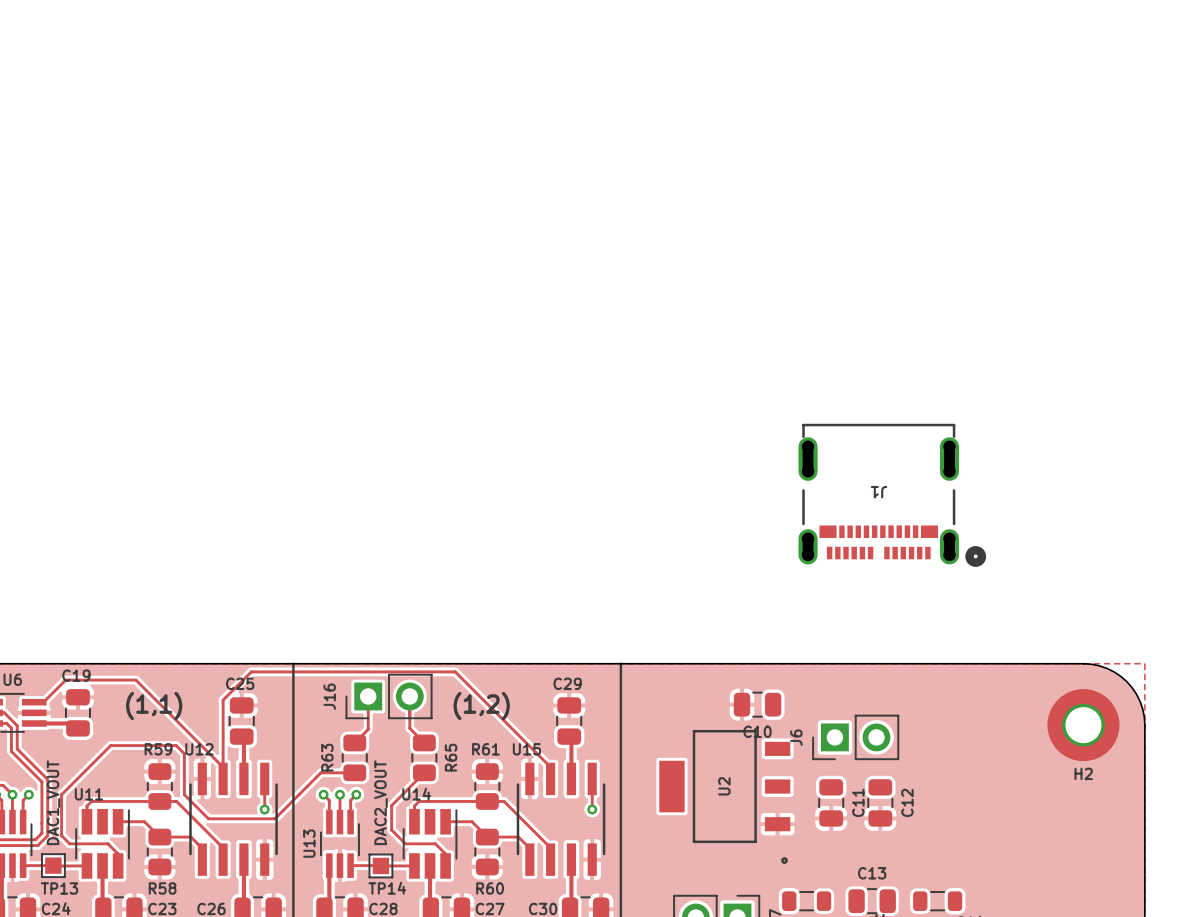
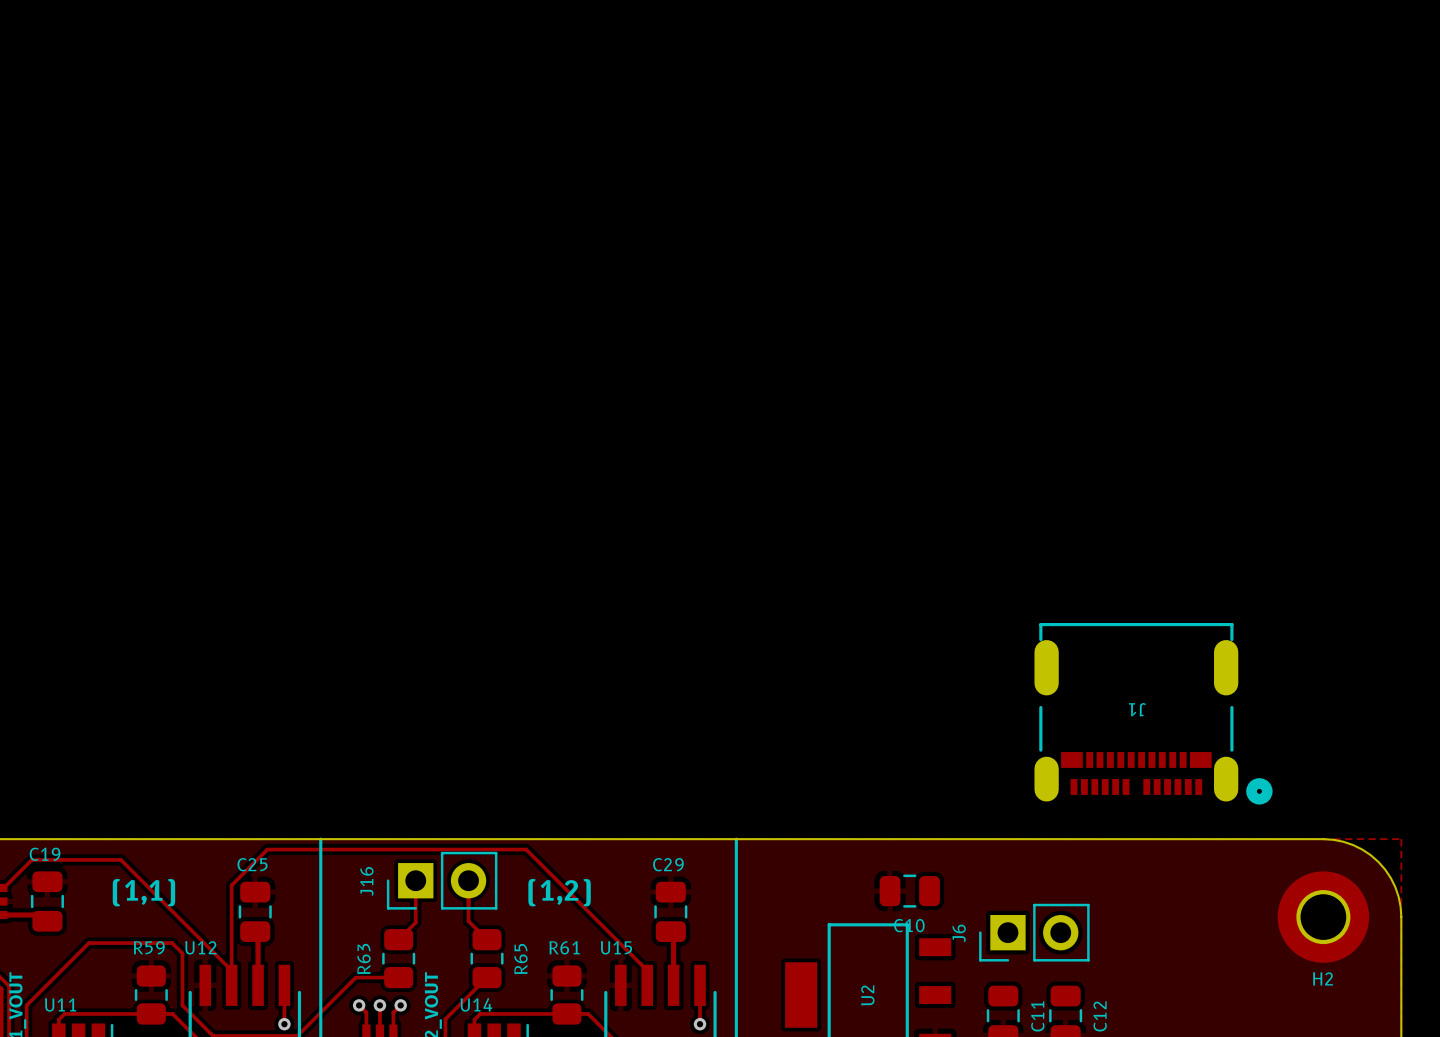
J1 position: (892, 495) -> (1153, 713)

